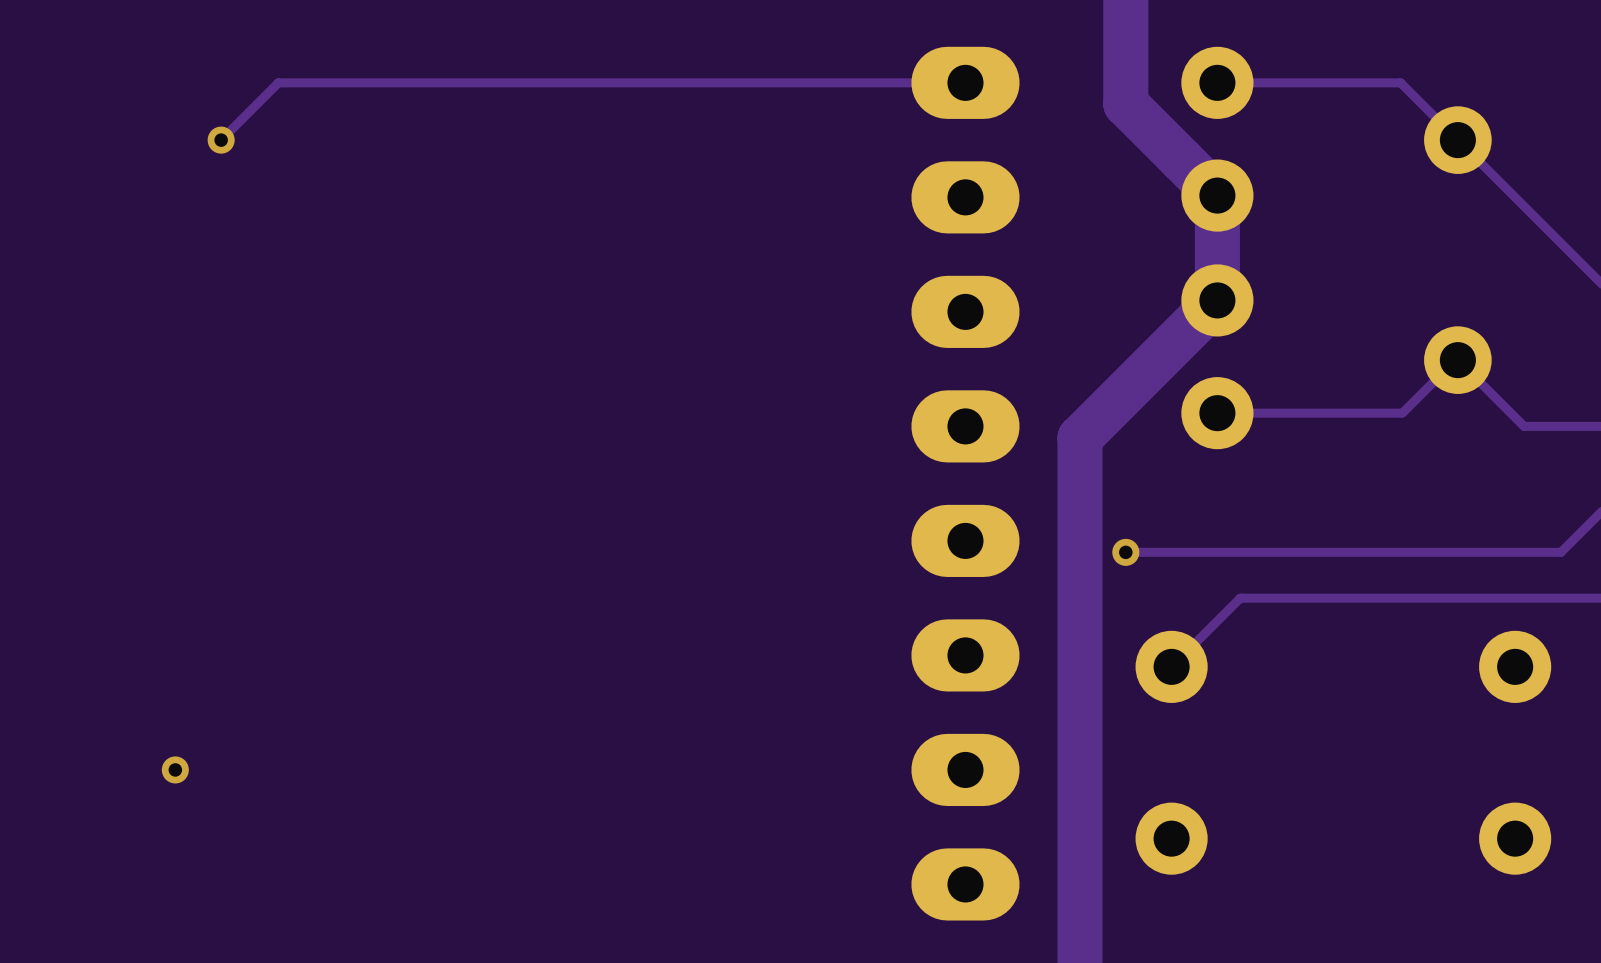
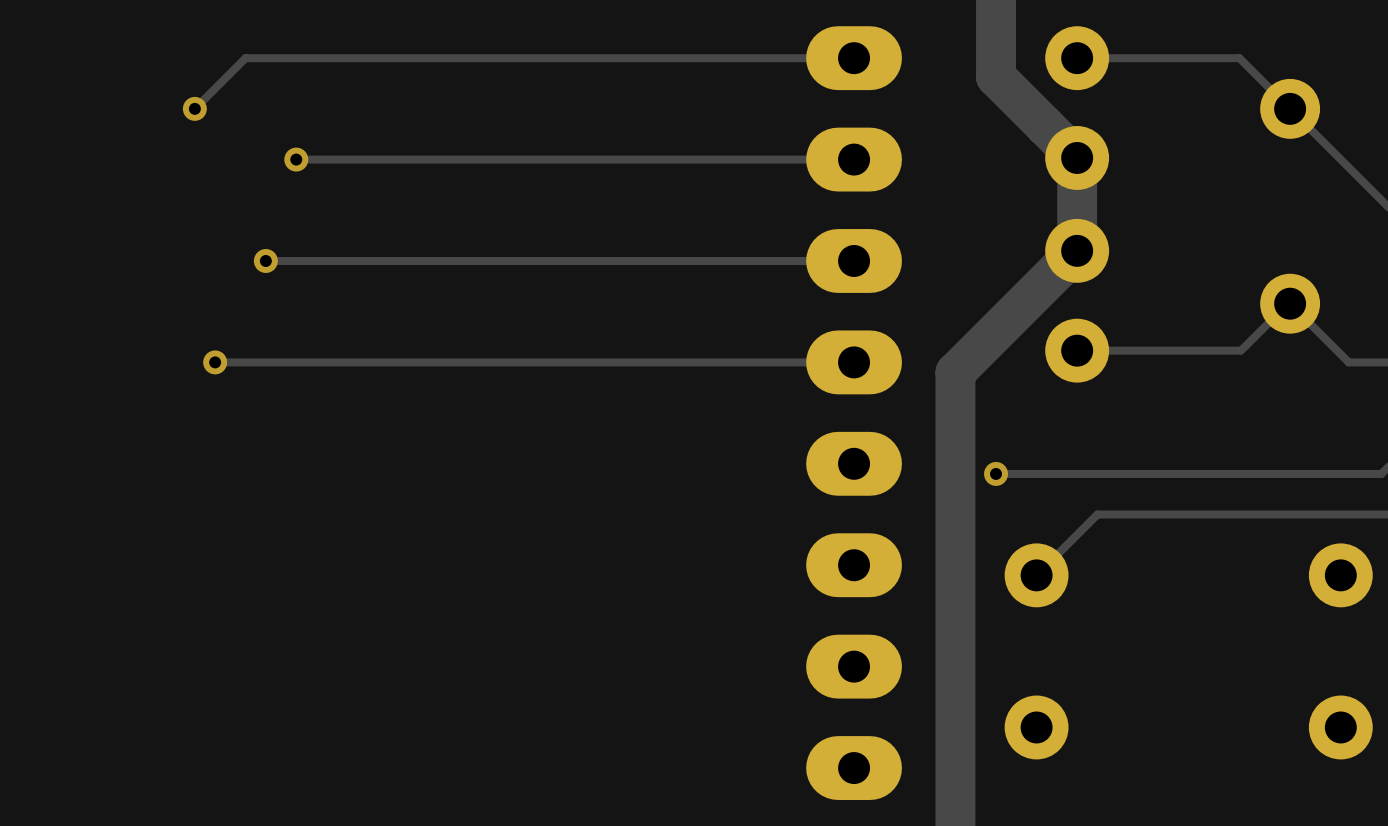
via: none -> (296, 159)
track: none -> (854, 159) (296, 159)
via: none -> (265, 260)
track: none -> (854, 260) (265, 260)
via: none -> (215, 362)
track: none -> (854, 362) (215, 362)
via: (175, 769) -> none

